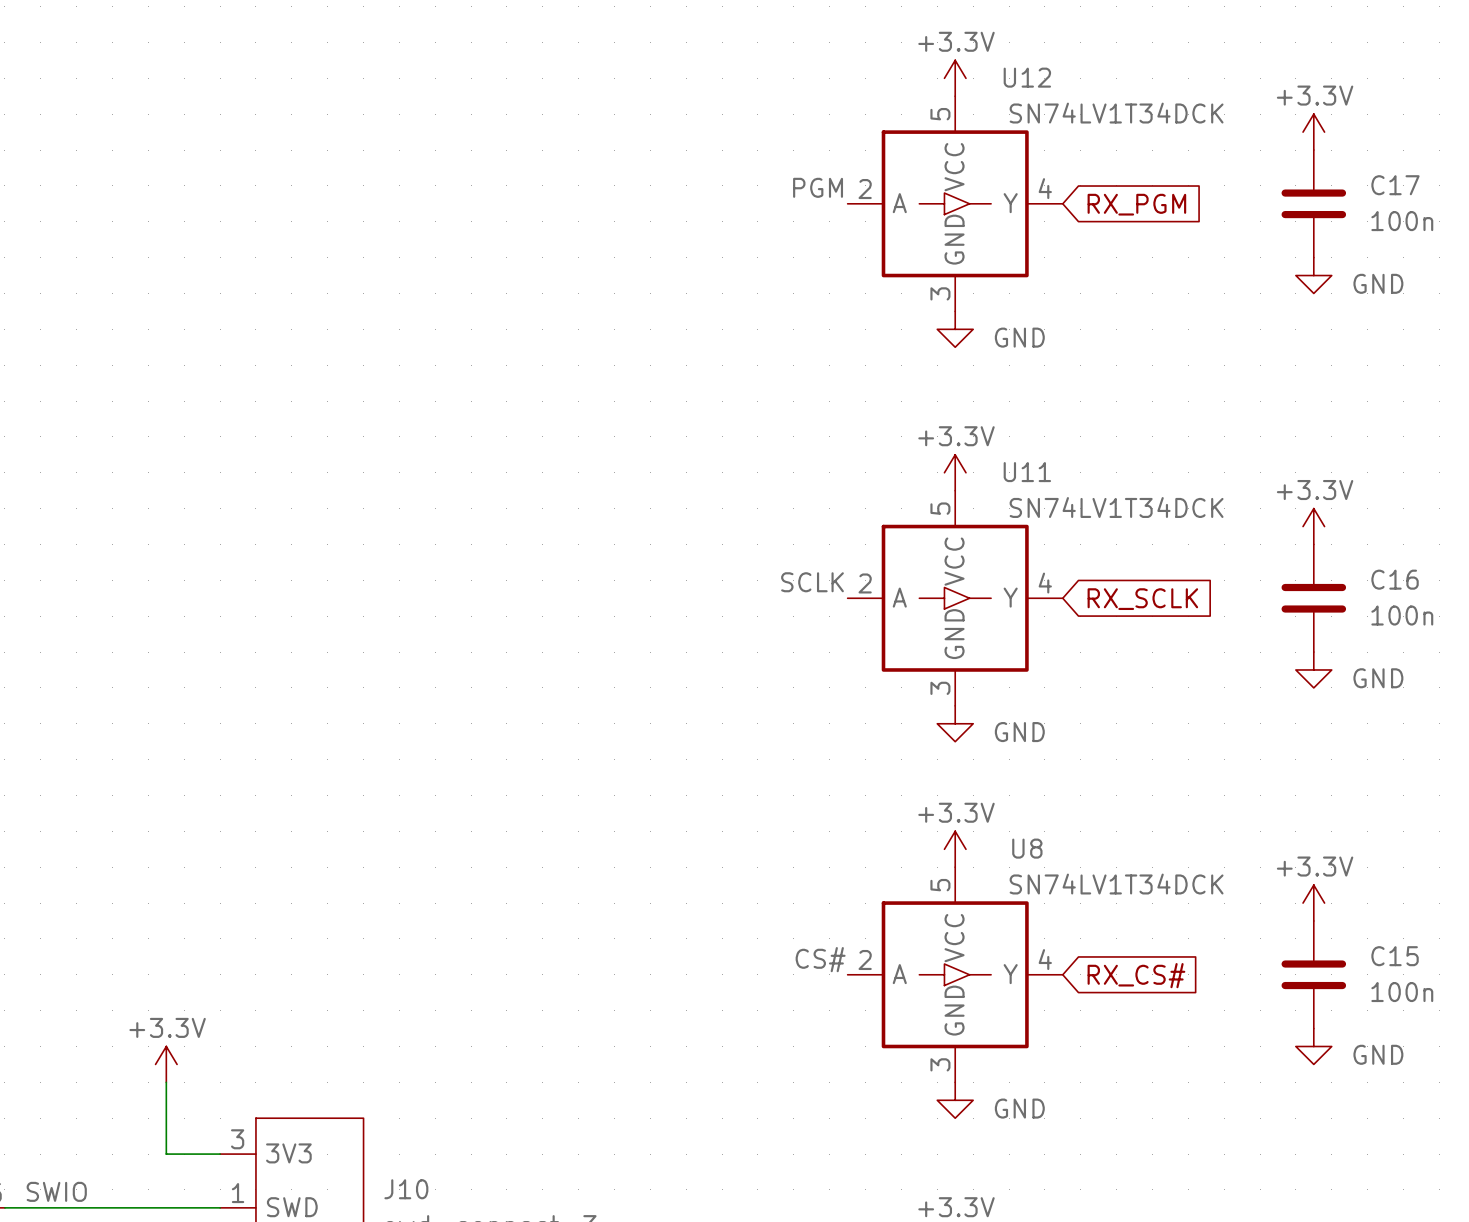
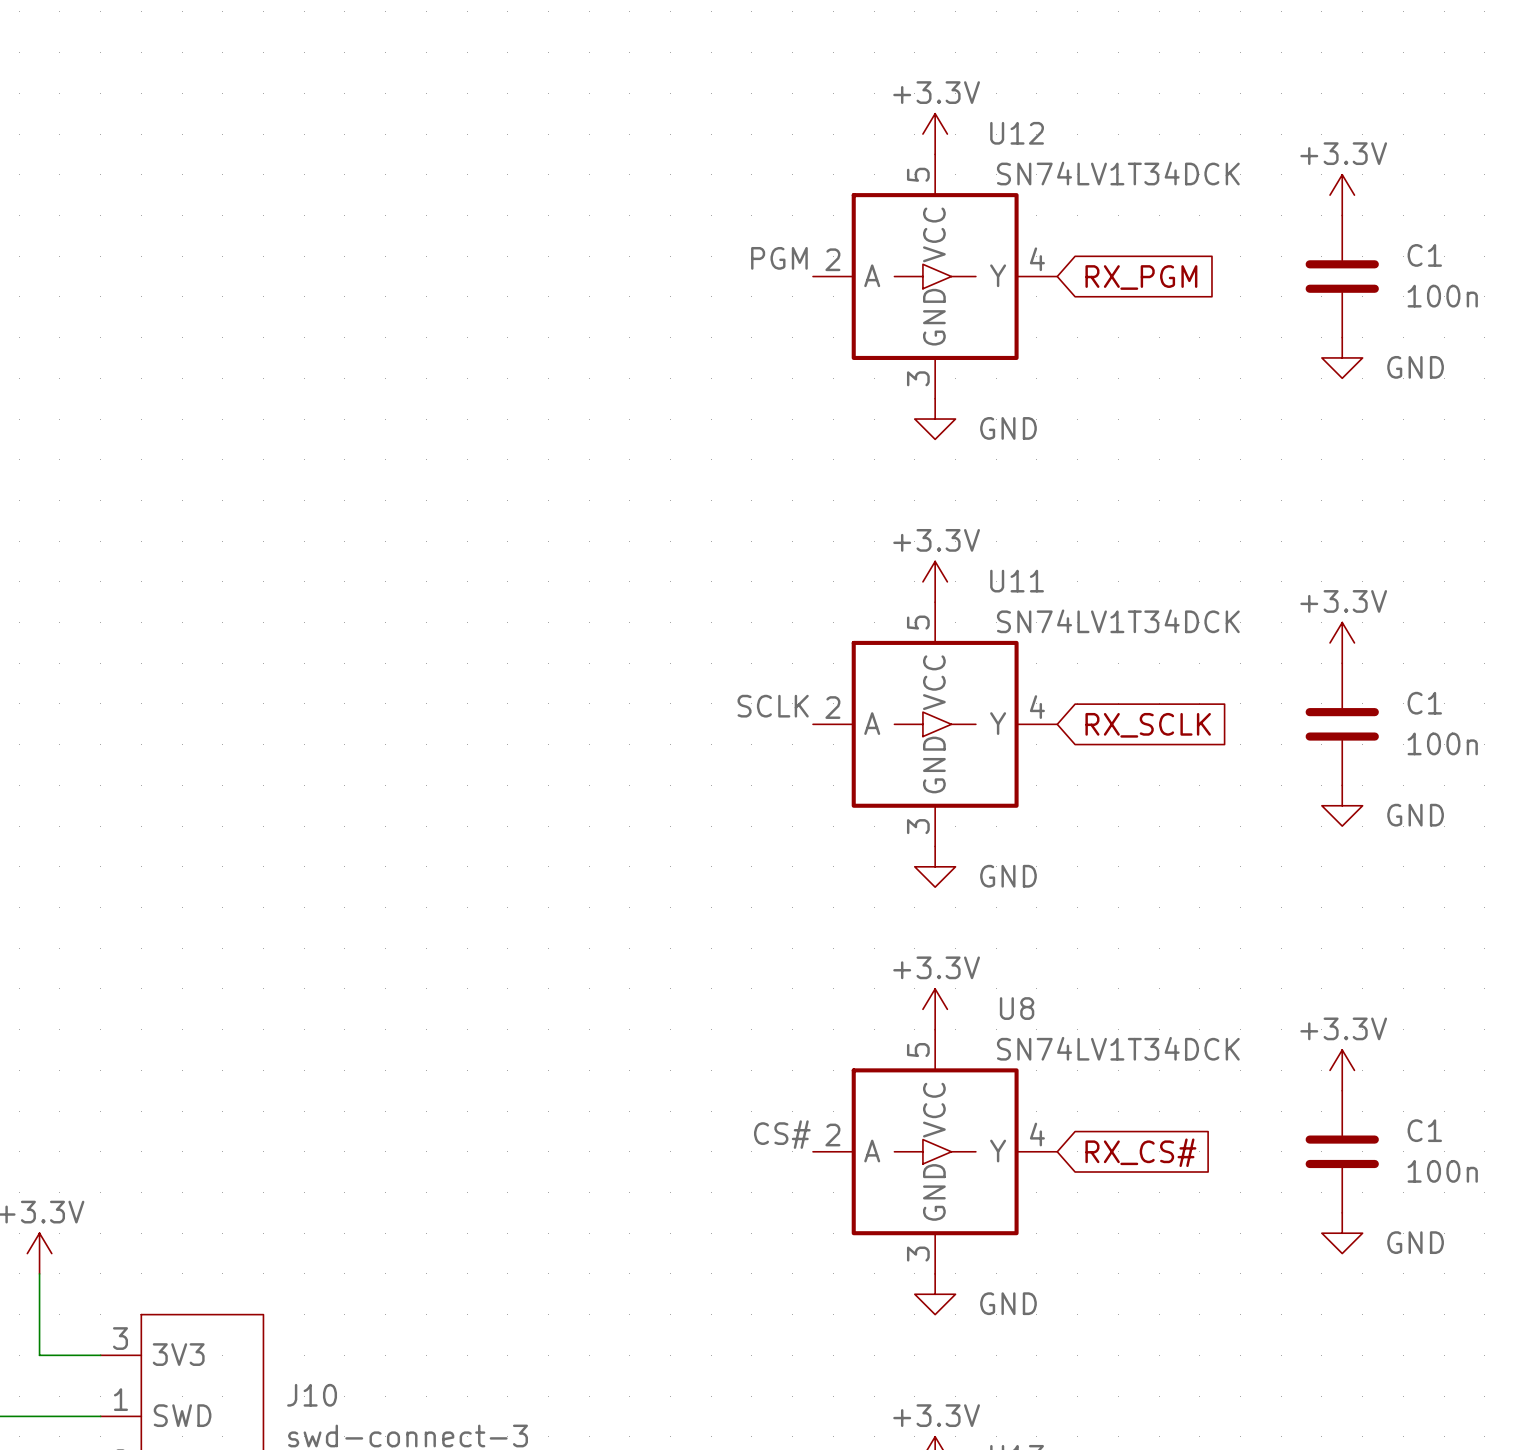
C17 name: C17 (1395, 185) -> C1 (1424, 255)
C16 name: C16 (1395, 579) -> C1 (1424, 703)
C15 name: C15 (1395, 956) -> C1 (1424, 1130)

